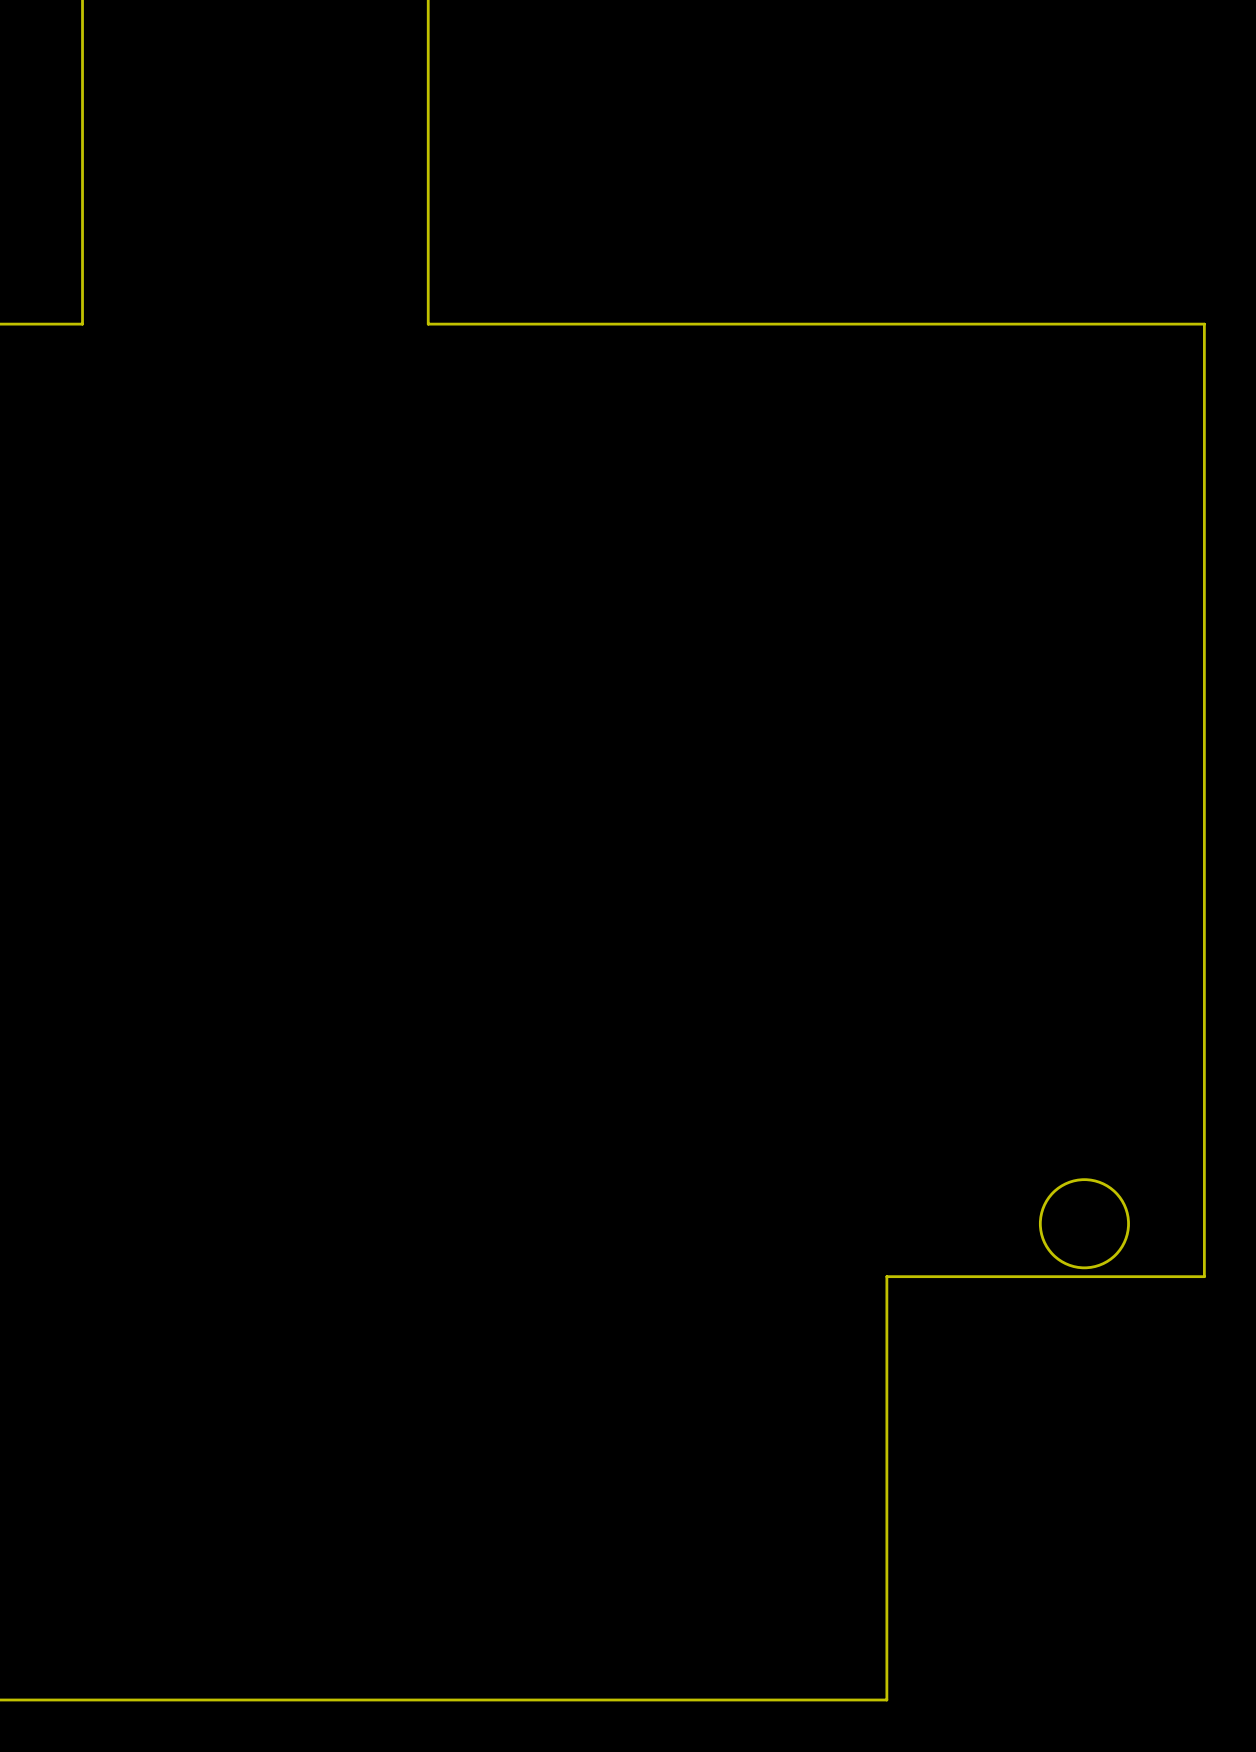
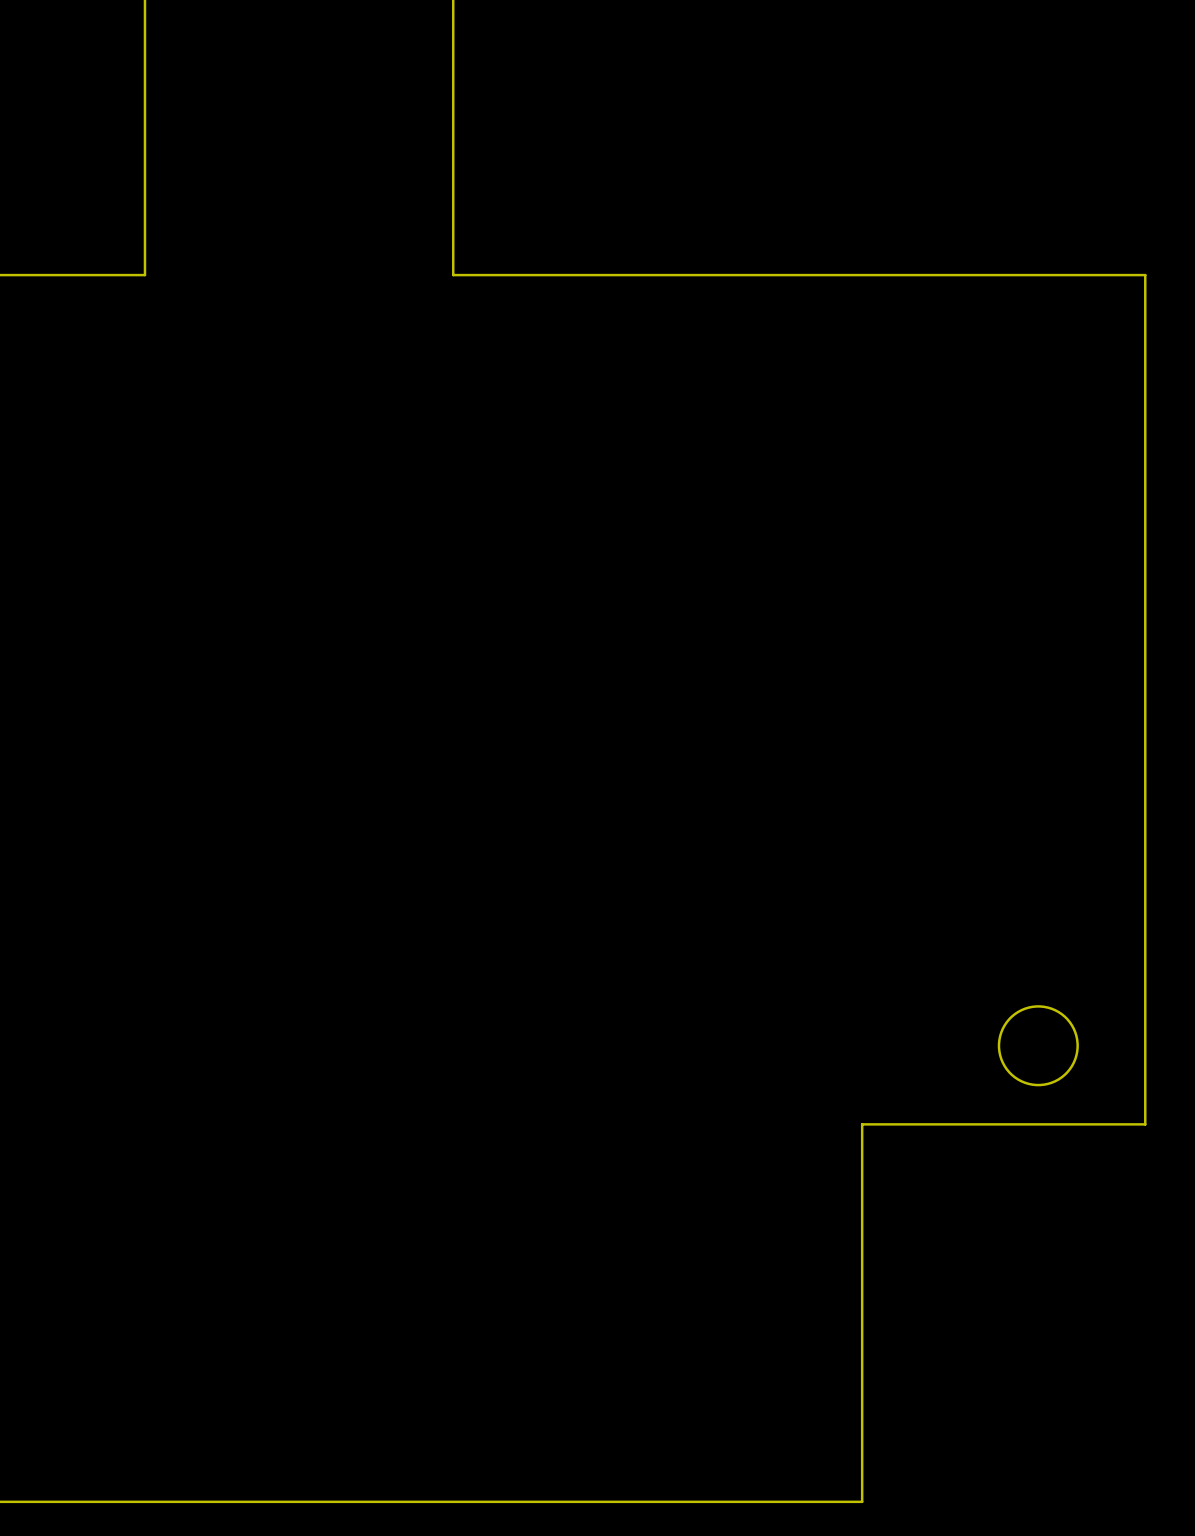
round board edge position: (1084, 1223) -> (1038, 1045)

